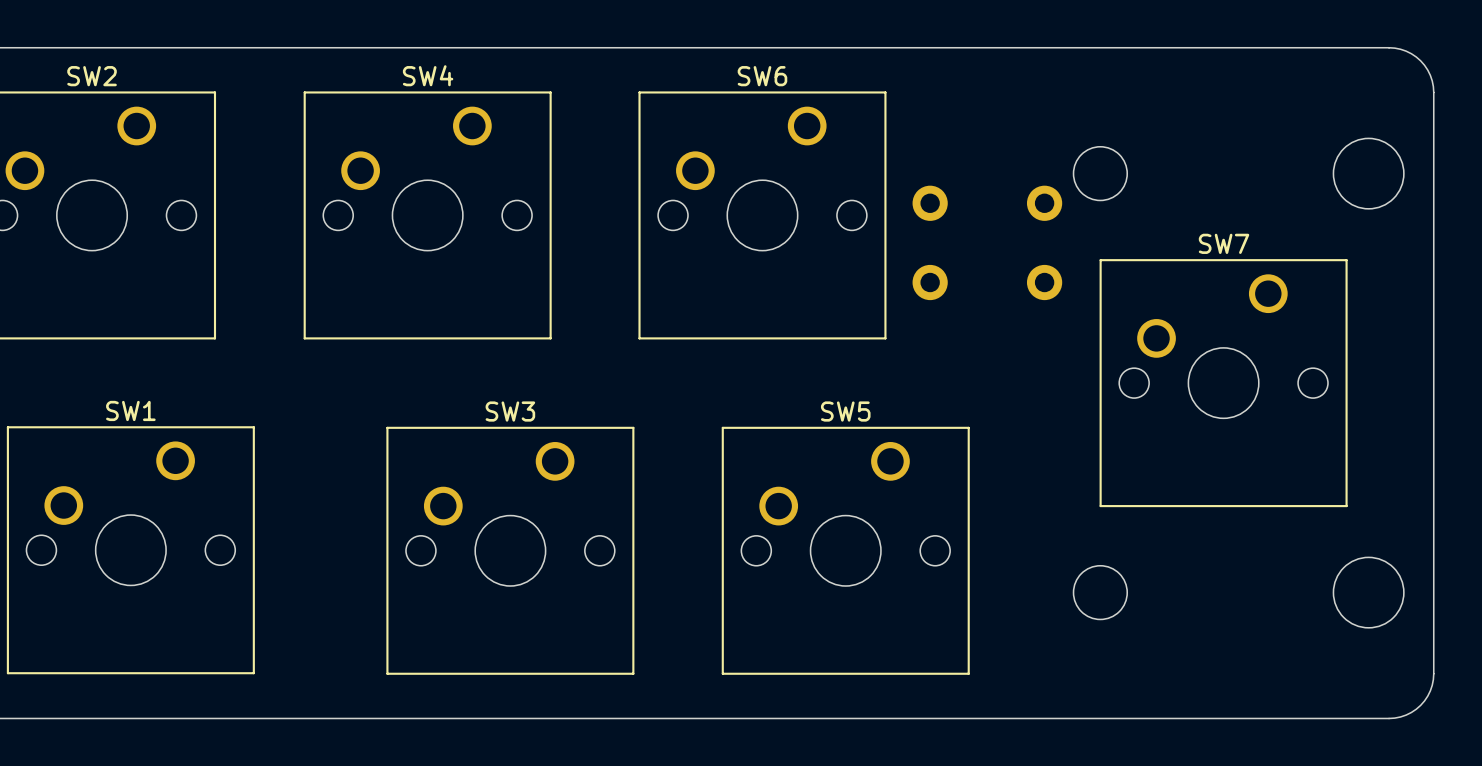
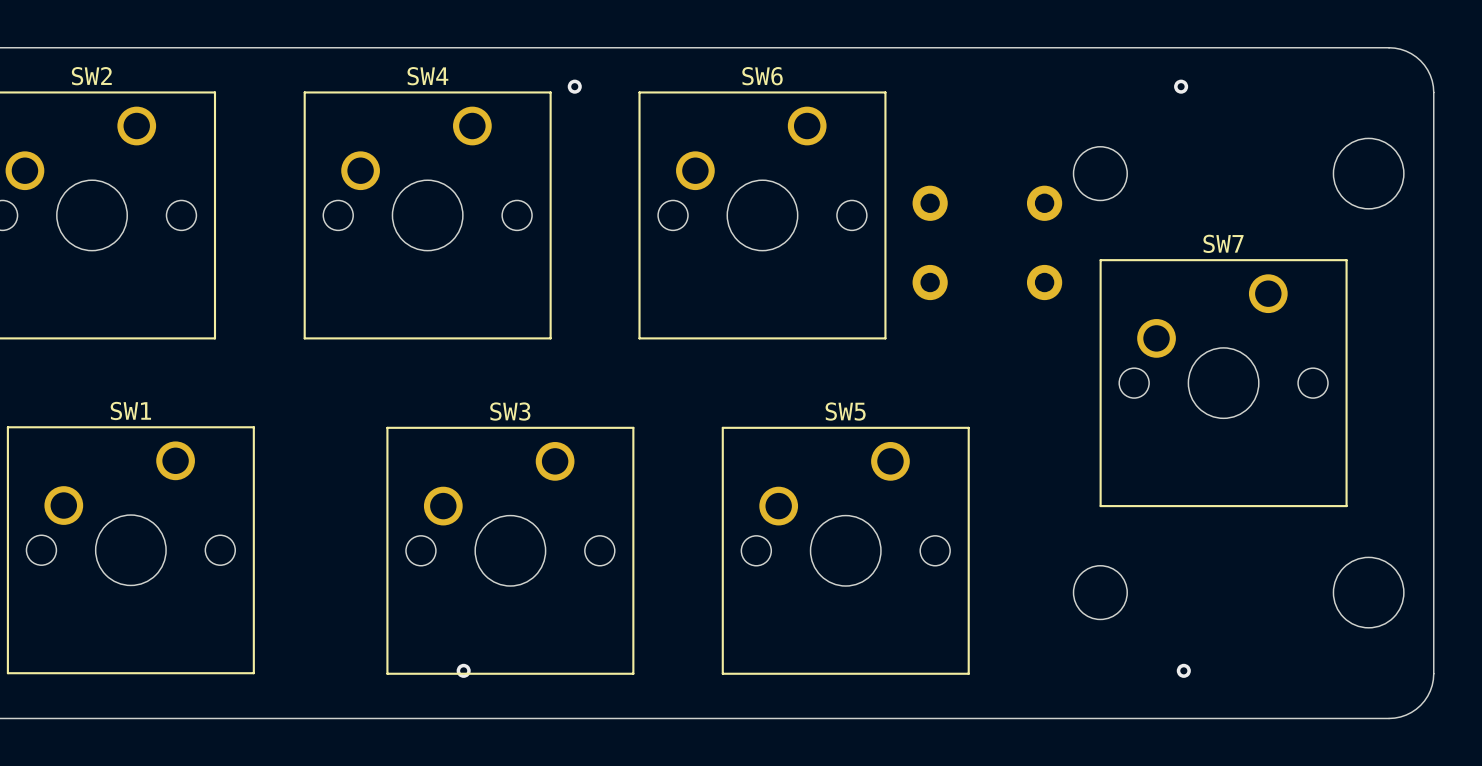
via: none -> (574, 86)
via: none -> (1181, 86)
via: none -> (463, 670)
via: none -> (1183, 670)

